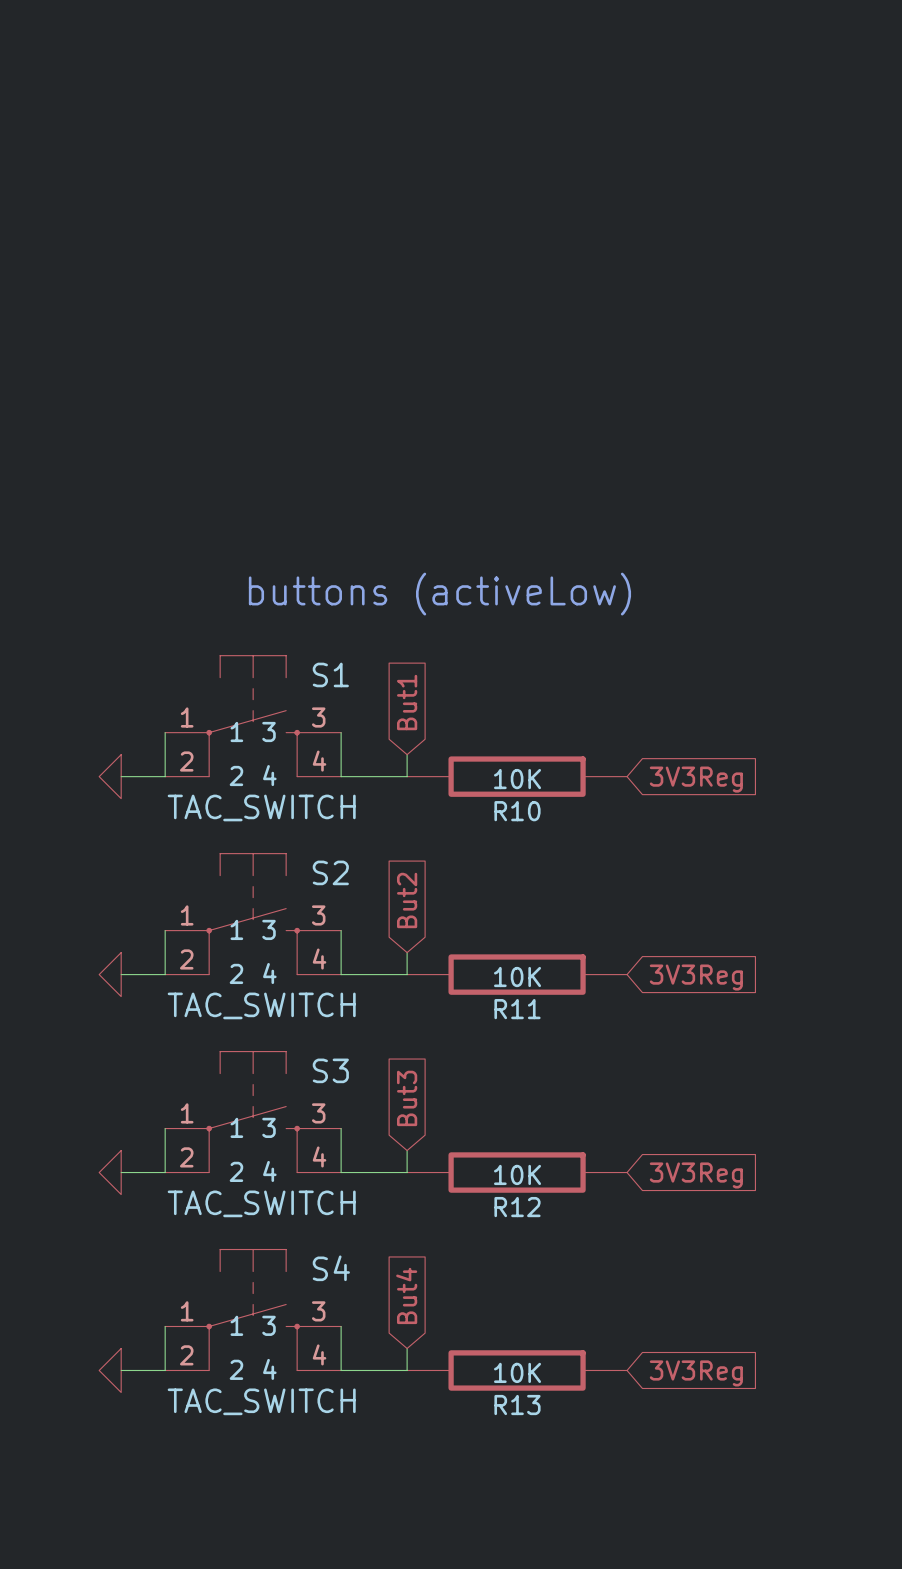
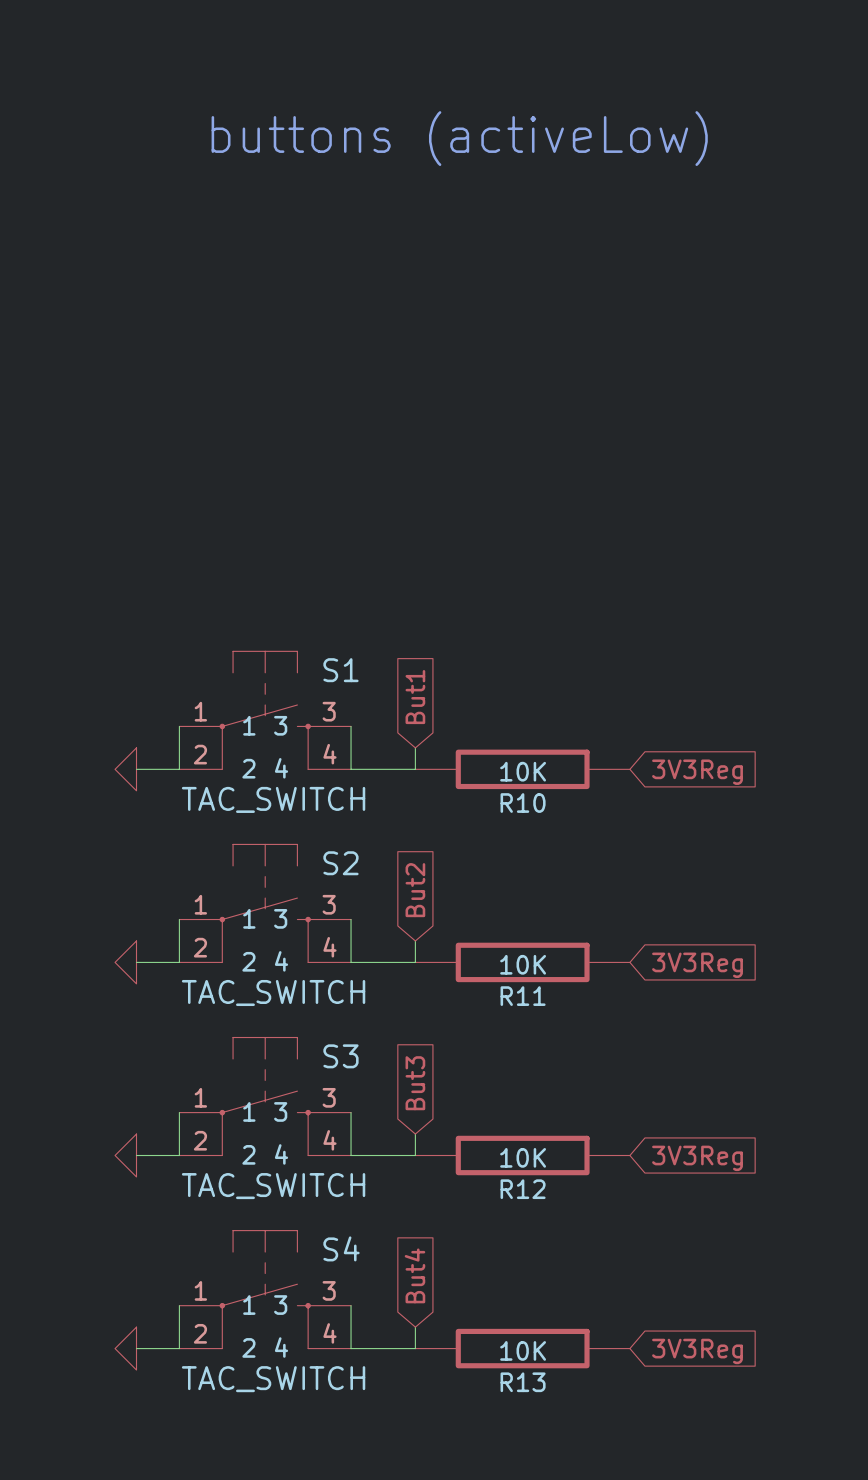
text: none -> buttons (activeLow) (459, 138)
text: buttons (activeLow) (439, 594) -> none

